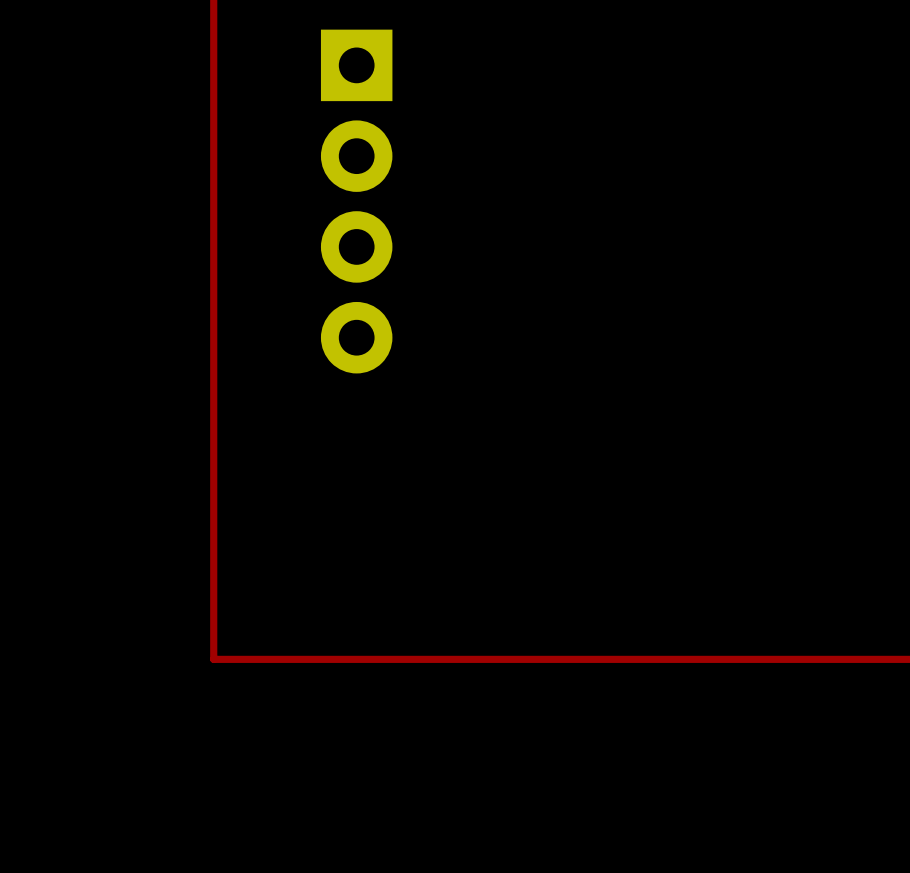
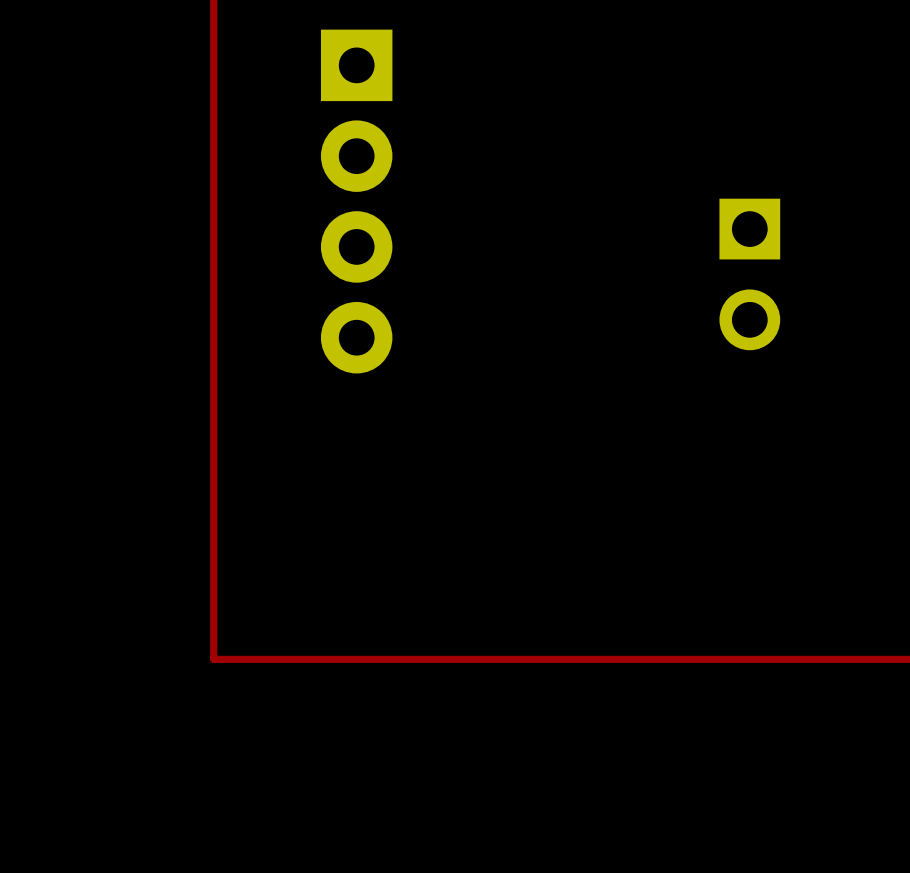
part: none -> (749, 274)

